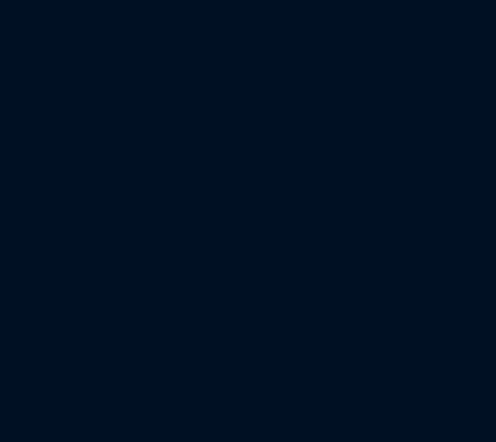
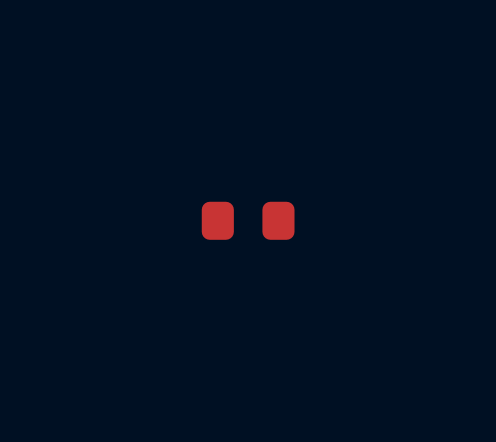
part: none -> (248, 220)

